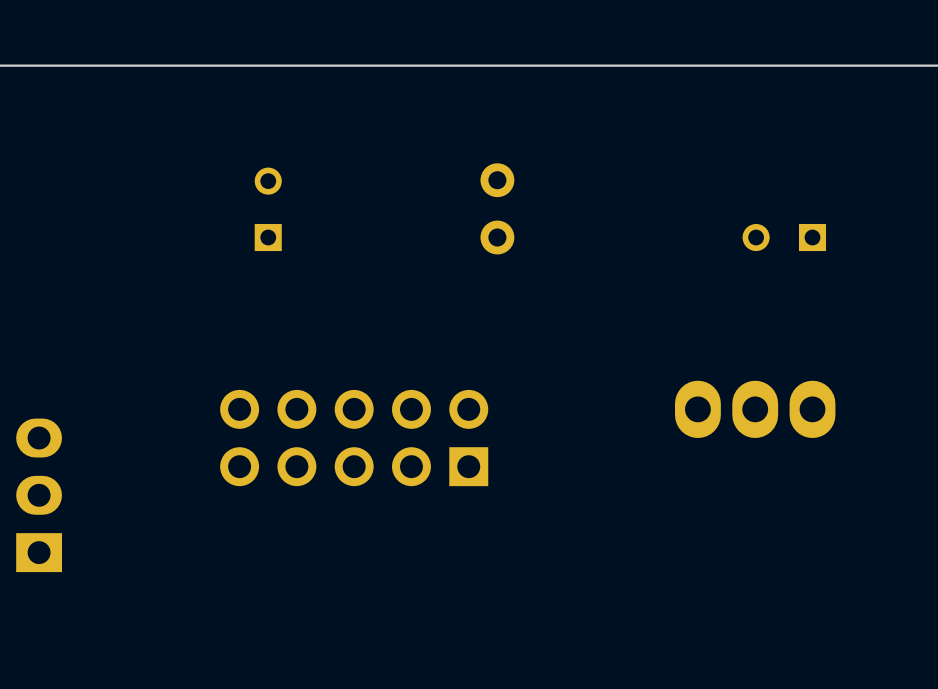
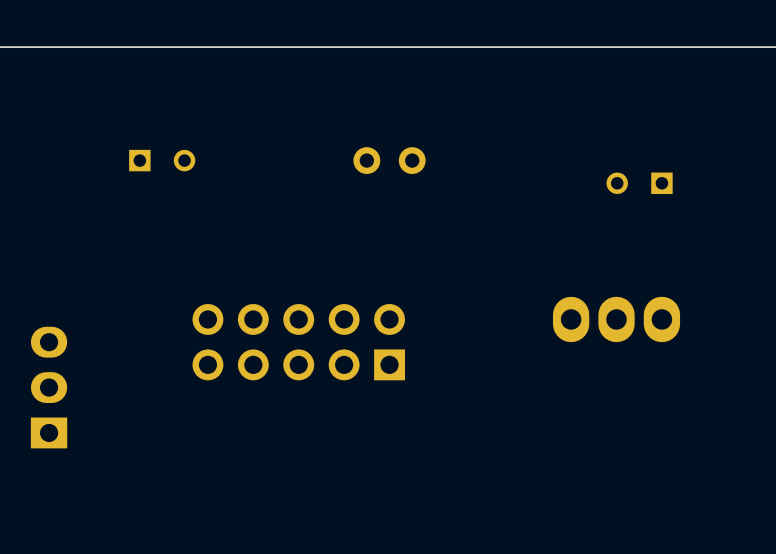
part rotation: 0° (497, 208) -> 90° clockwise (389, 160)
part rotation: 0° (268, 209) -> 90° clockwise (162, 160)
part position: (268, 209) -> (162, 160)

